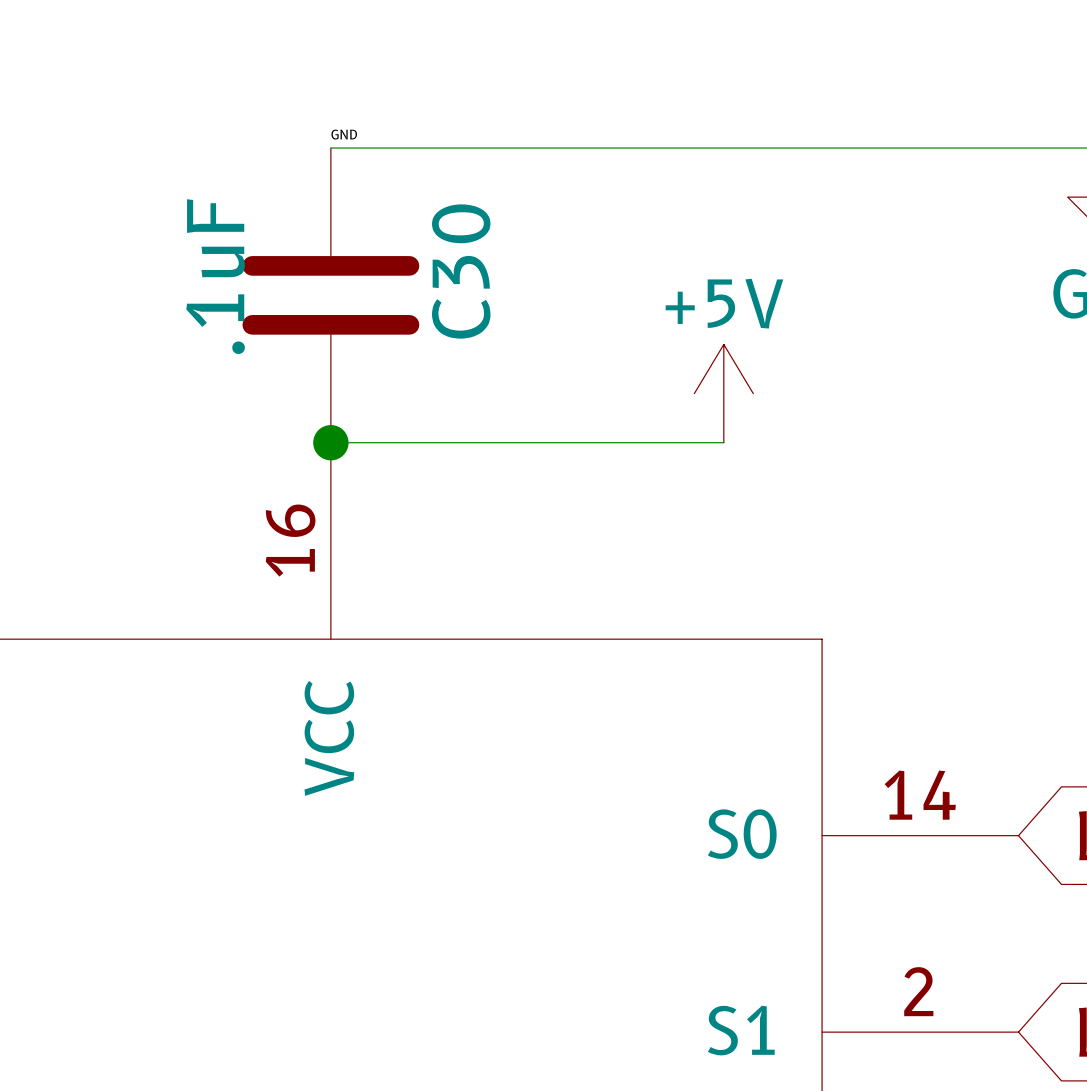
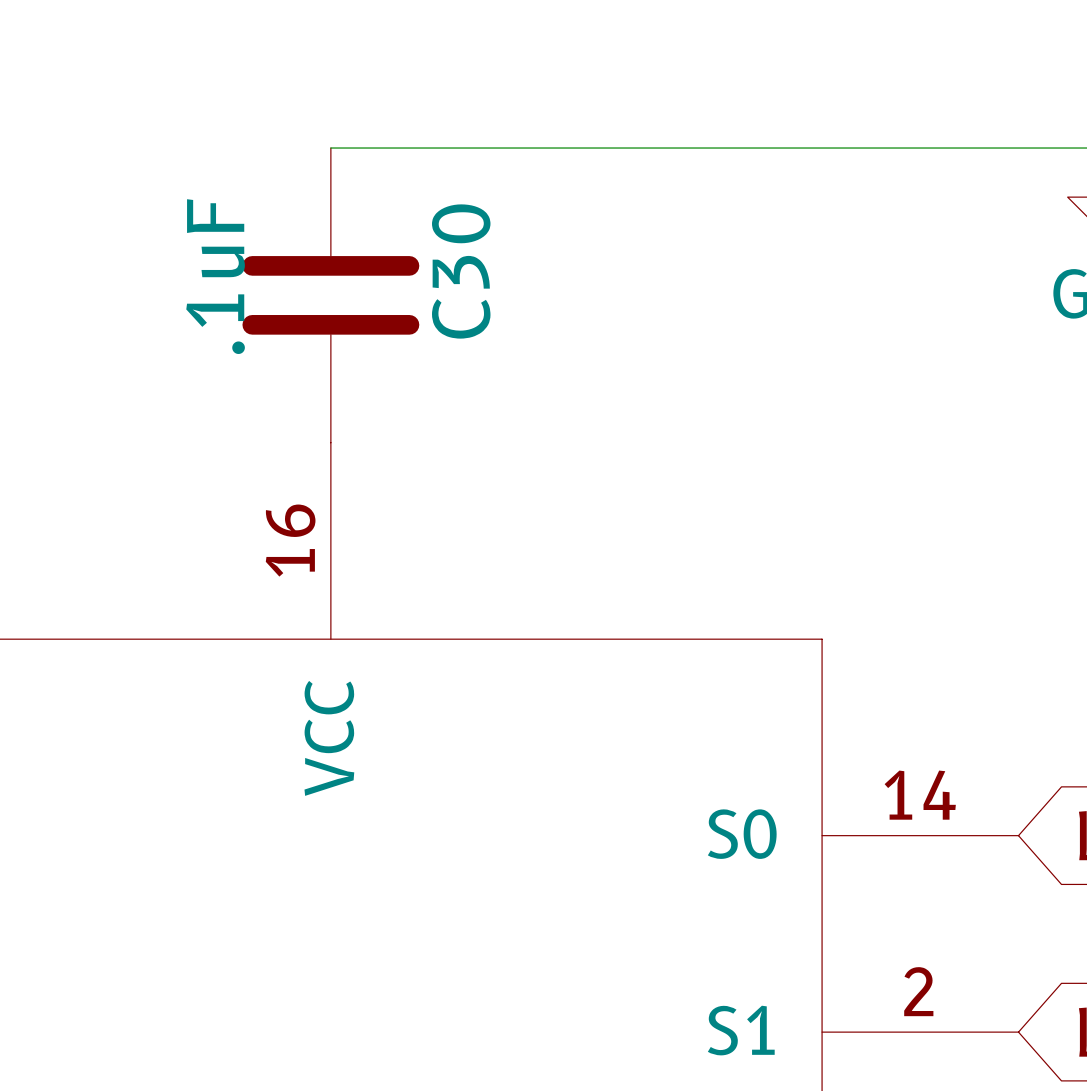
label: GND (344, 134) -> none
power symbol: +5V (723, 393) -> none
wire: (330, 442) (723, 442) -> none
junction: (330, 442) -> none

